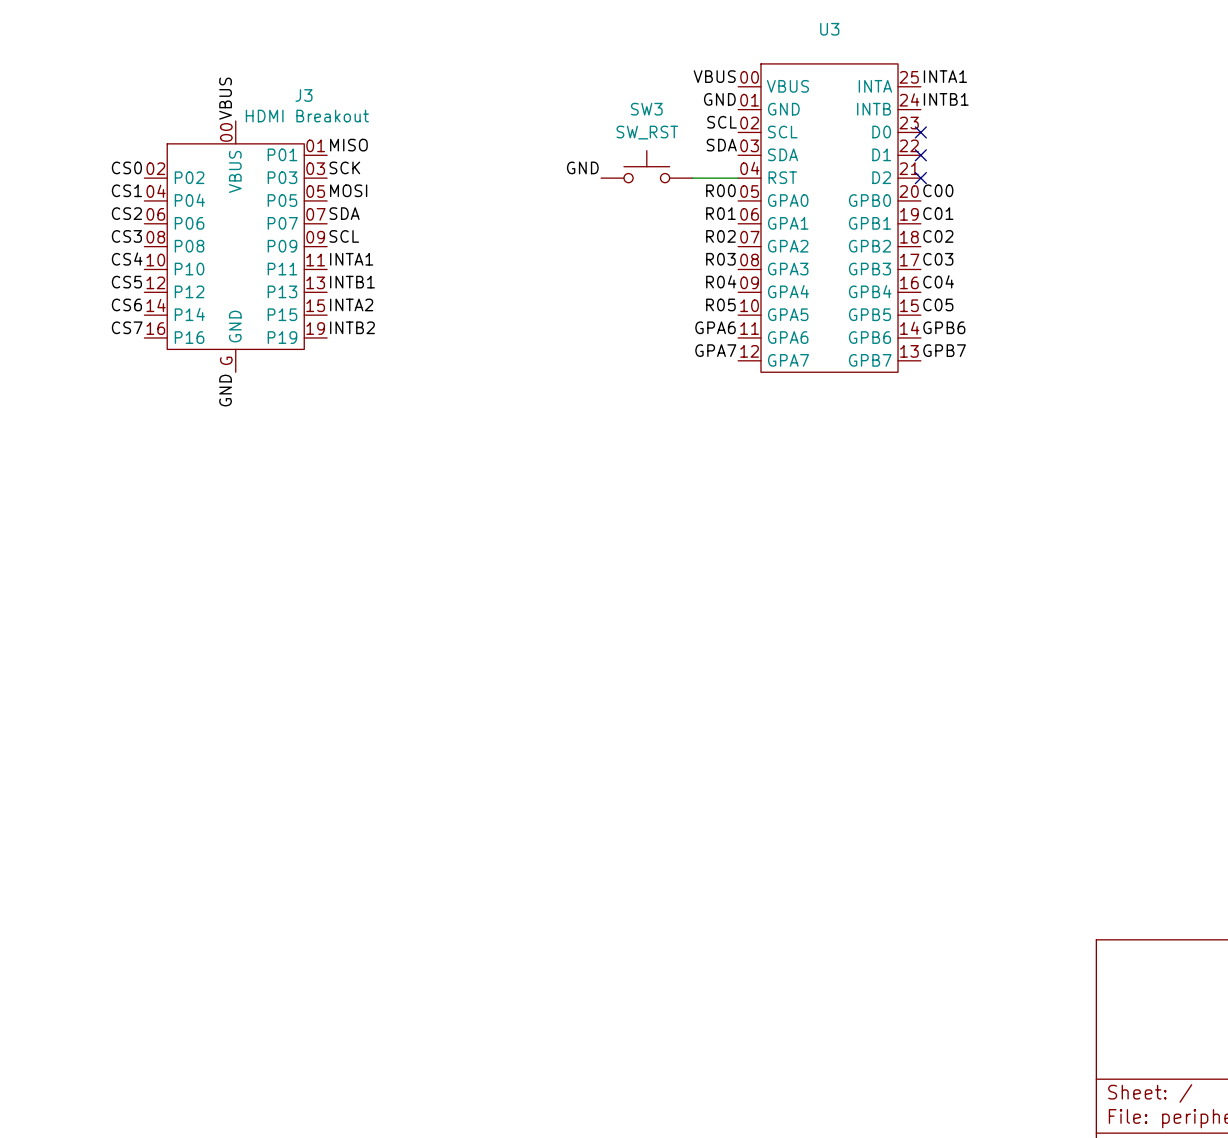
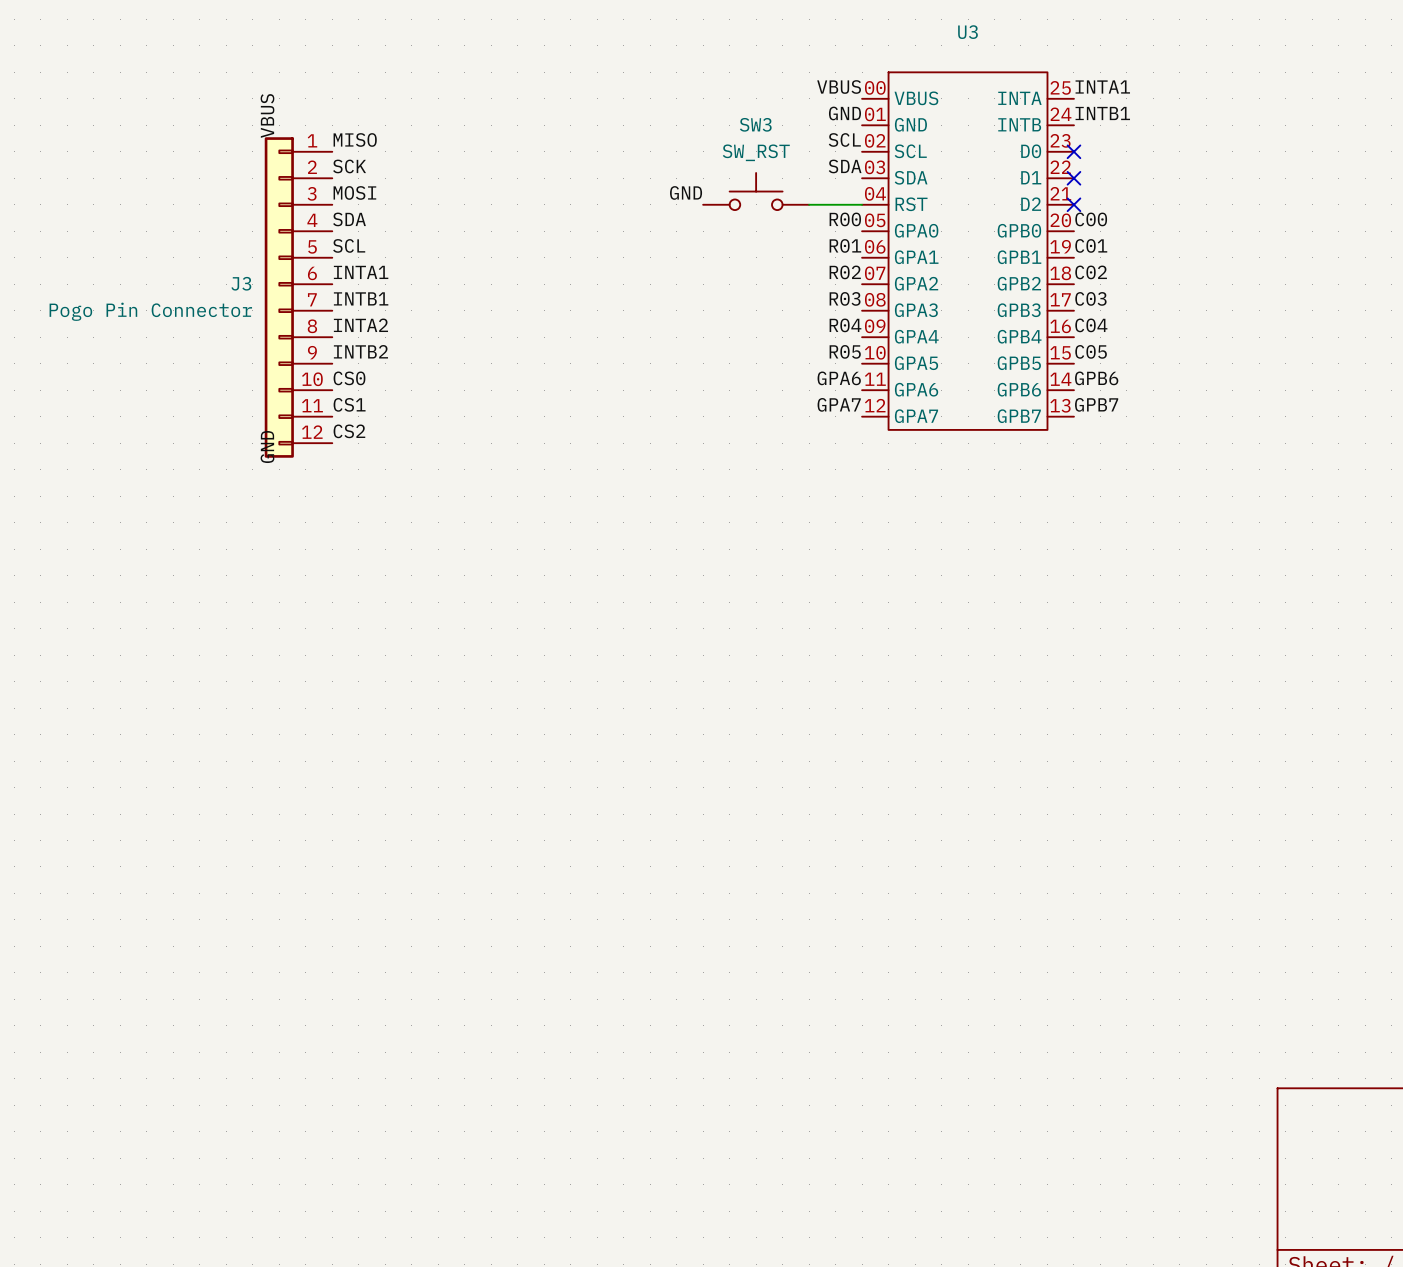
J3 name position: J3 (303, 95) -> J3 (241, 283)
J3 value: HDMI Breakout (307, 116) -> Pogo Pin Connector (150, 311)
J3 symbol: [144, 121, 328, 373] -> [264, 137, 333, 458]
label position: MISO (348, 145) -> MISO (355, 139)
label position: CS0 (126, 167) -> CS0 (349, 378)
label position: SCK (344, 167) -> SCK (349, 166)
label position: CS1 (126, 190) -> CS1 (349, 404)
label position: MOSI (348, 190) -> MOSI (354, 192)
label position: CS2 (126, 213) -> CS2 (349, 431)
label position: SDA (344, 213) -> SDA (349, 219)
label: CS3 (126, 236) -> none
label position: SCL (344, 236) -> SCL (349, 245)
label: CS4 (127, 259) -> none
label position: INTA1 (351, 259) -> INTA1 (361, 272)
label: CS5 (126, 282) -> none
label position: INTB1 (352, 282) -> INTB1 (361, 298)
label: CS6 (126, 304) -> none
label position: INTA2 (351, 304) -> INTA2 (360, 325)
label: CS7 (127, 327) -> none
label position: INTB2 (352, 327) -> INTB2 (360, 351)

